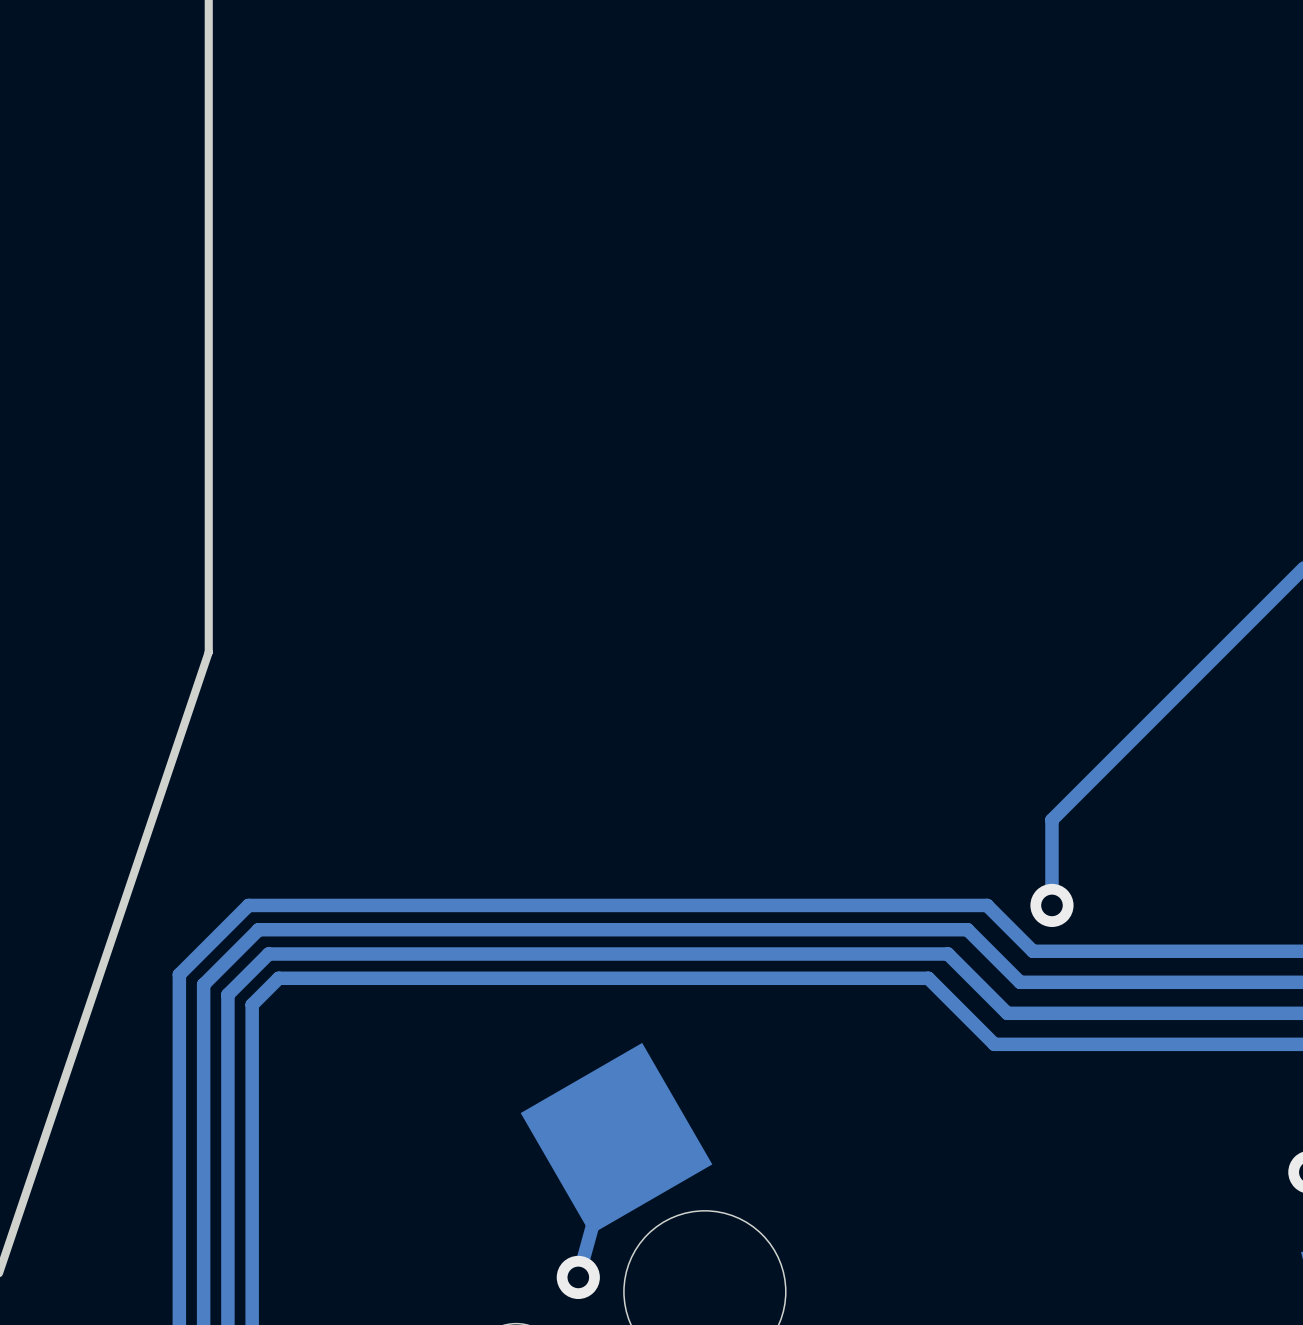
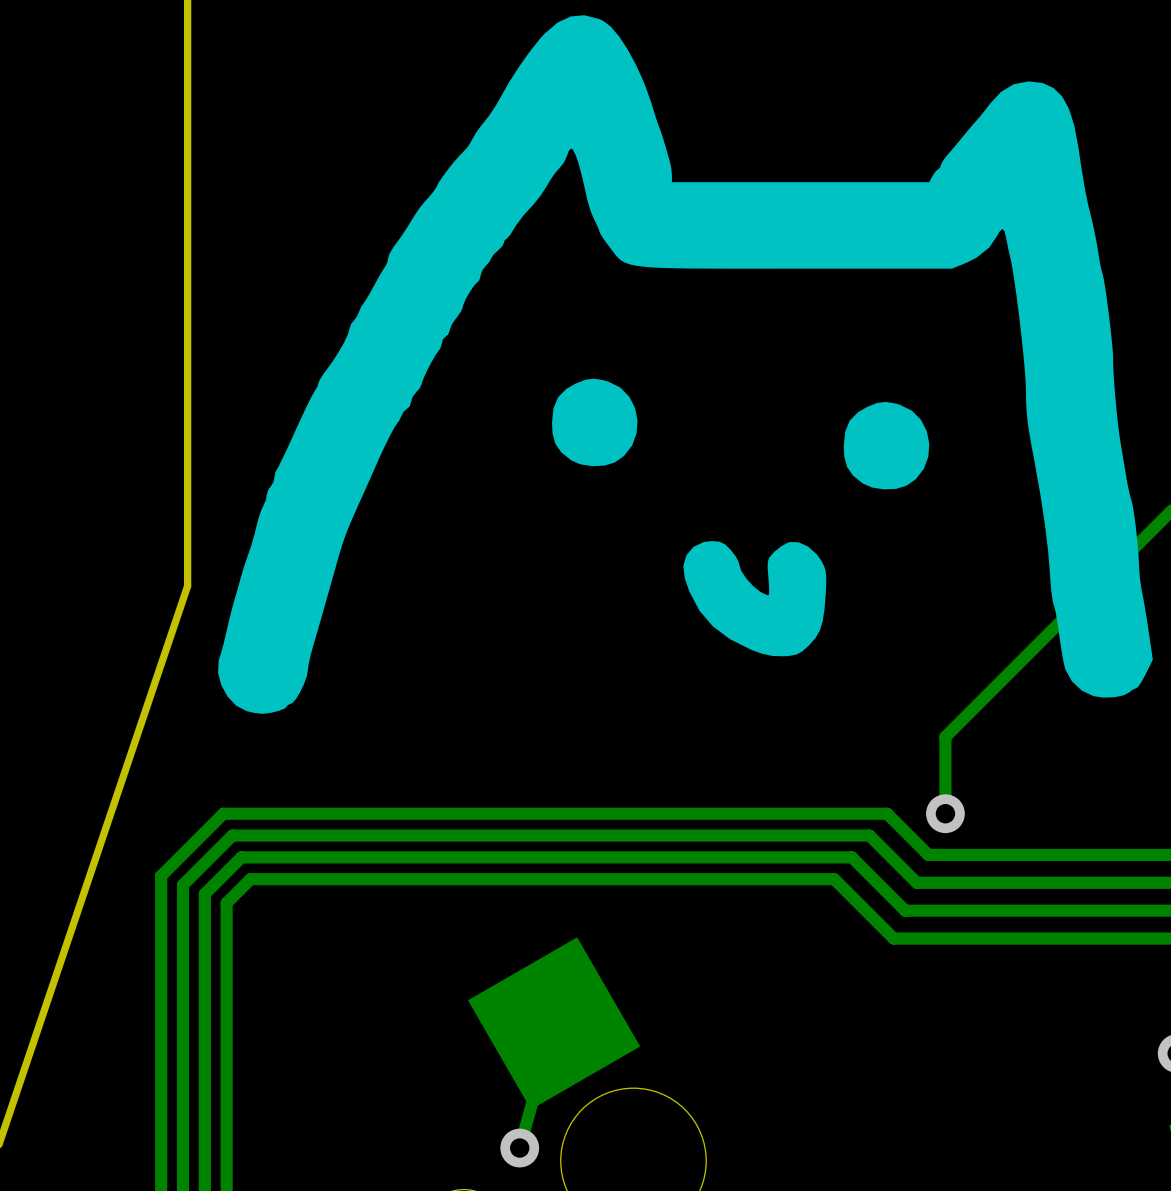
drawing: none -> [218, 15, 1153, 714]

